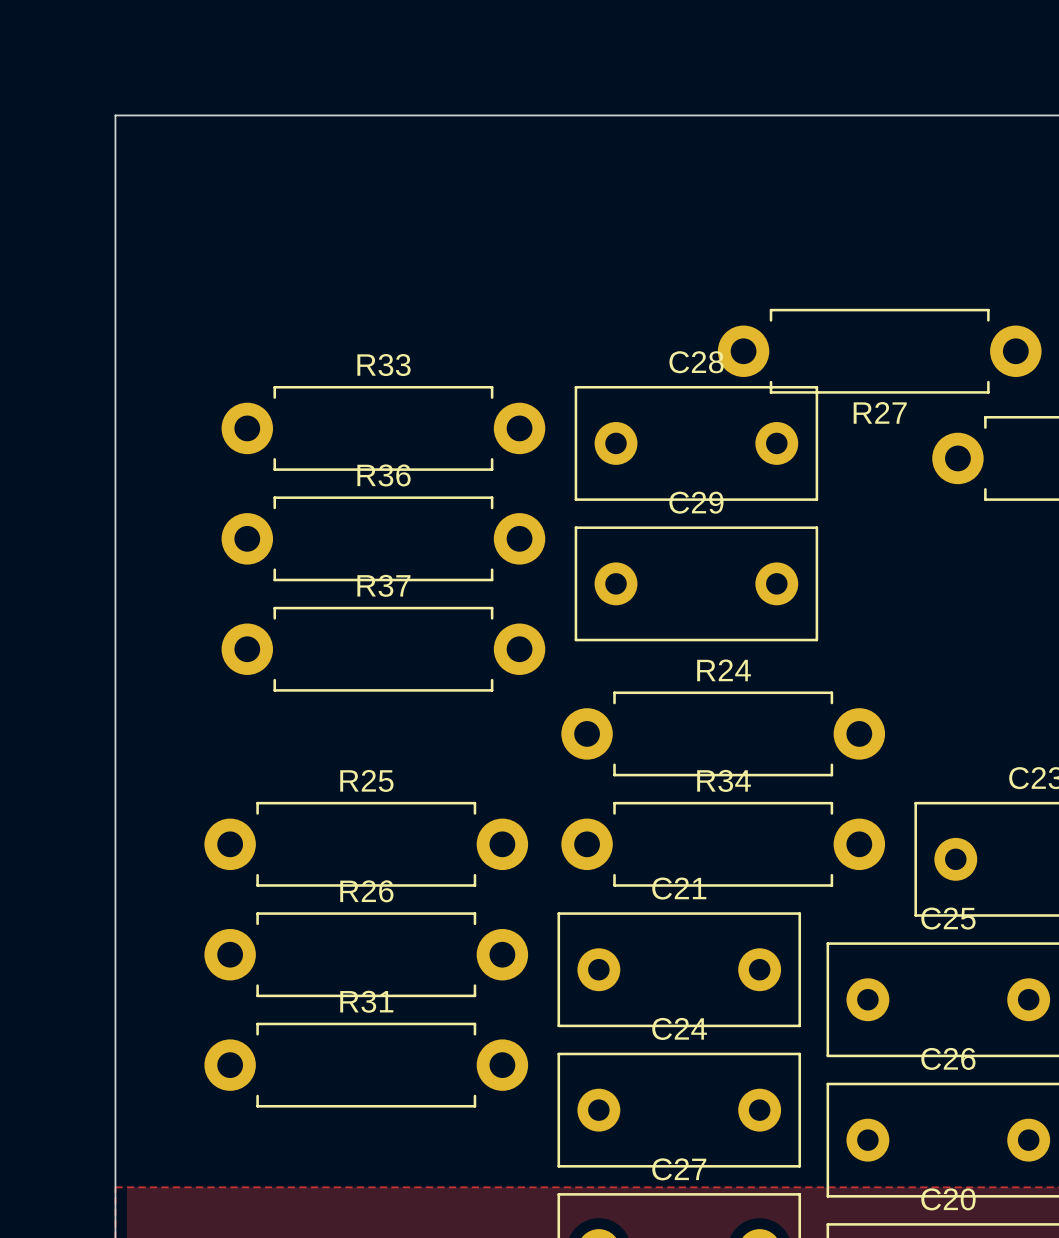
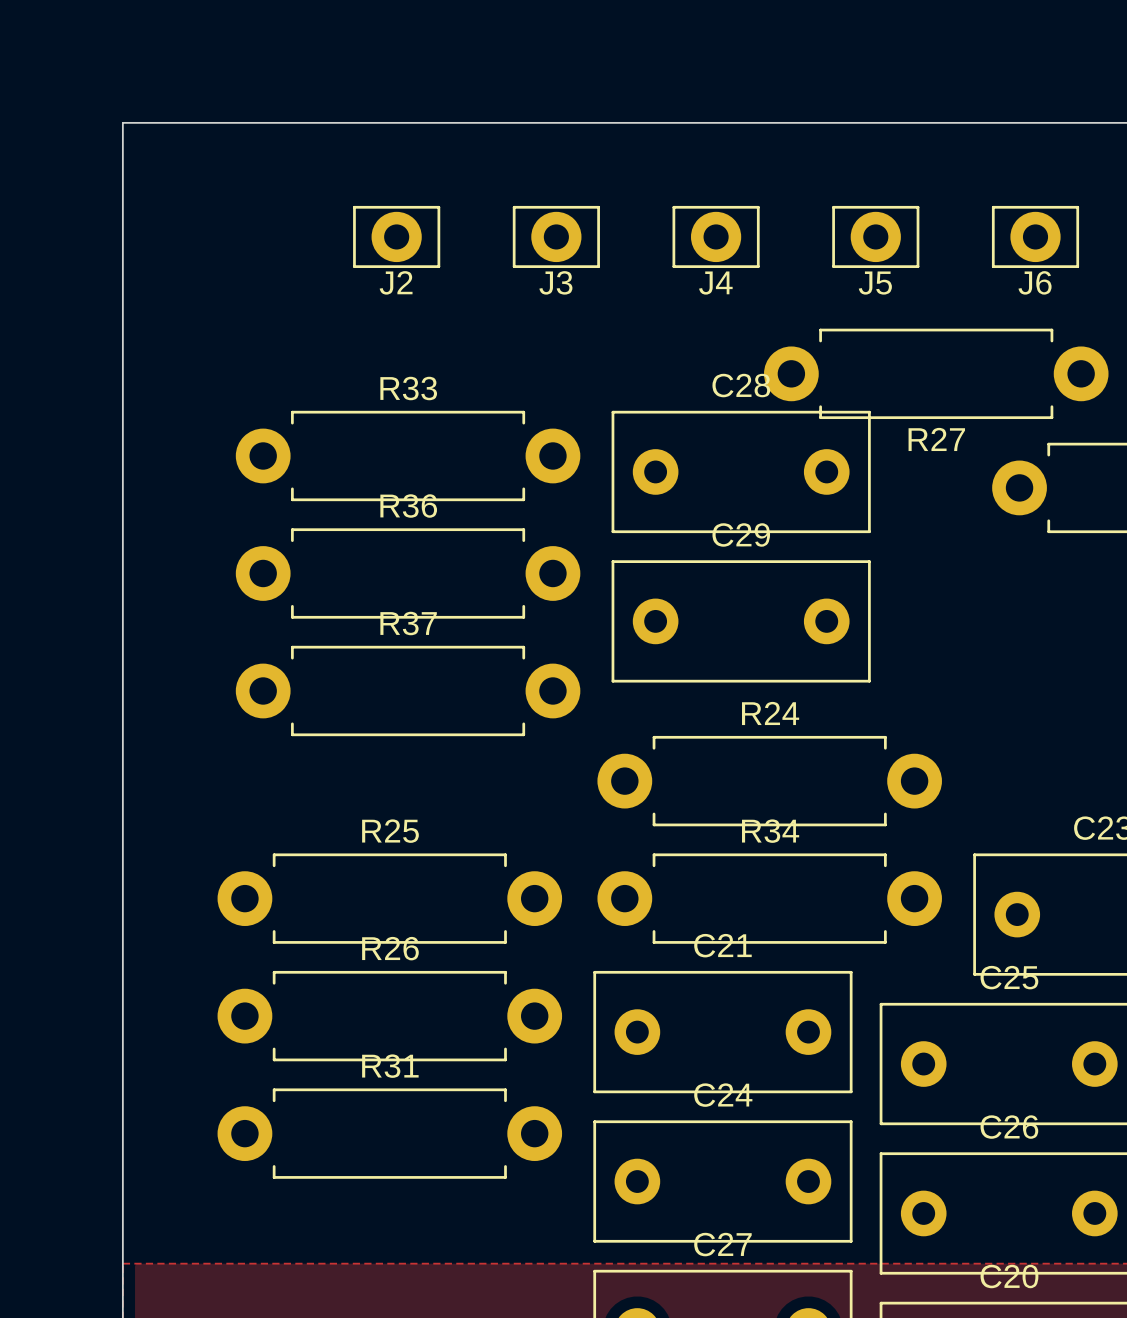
J2: none -> (396, 236)
J3: none -> (556, 236)
J4: none -> (716, 236)
J5: none -> (875, 236)
J6: none -> (1035, 236)

